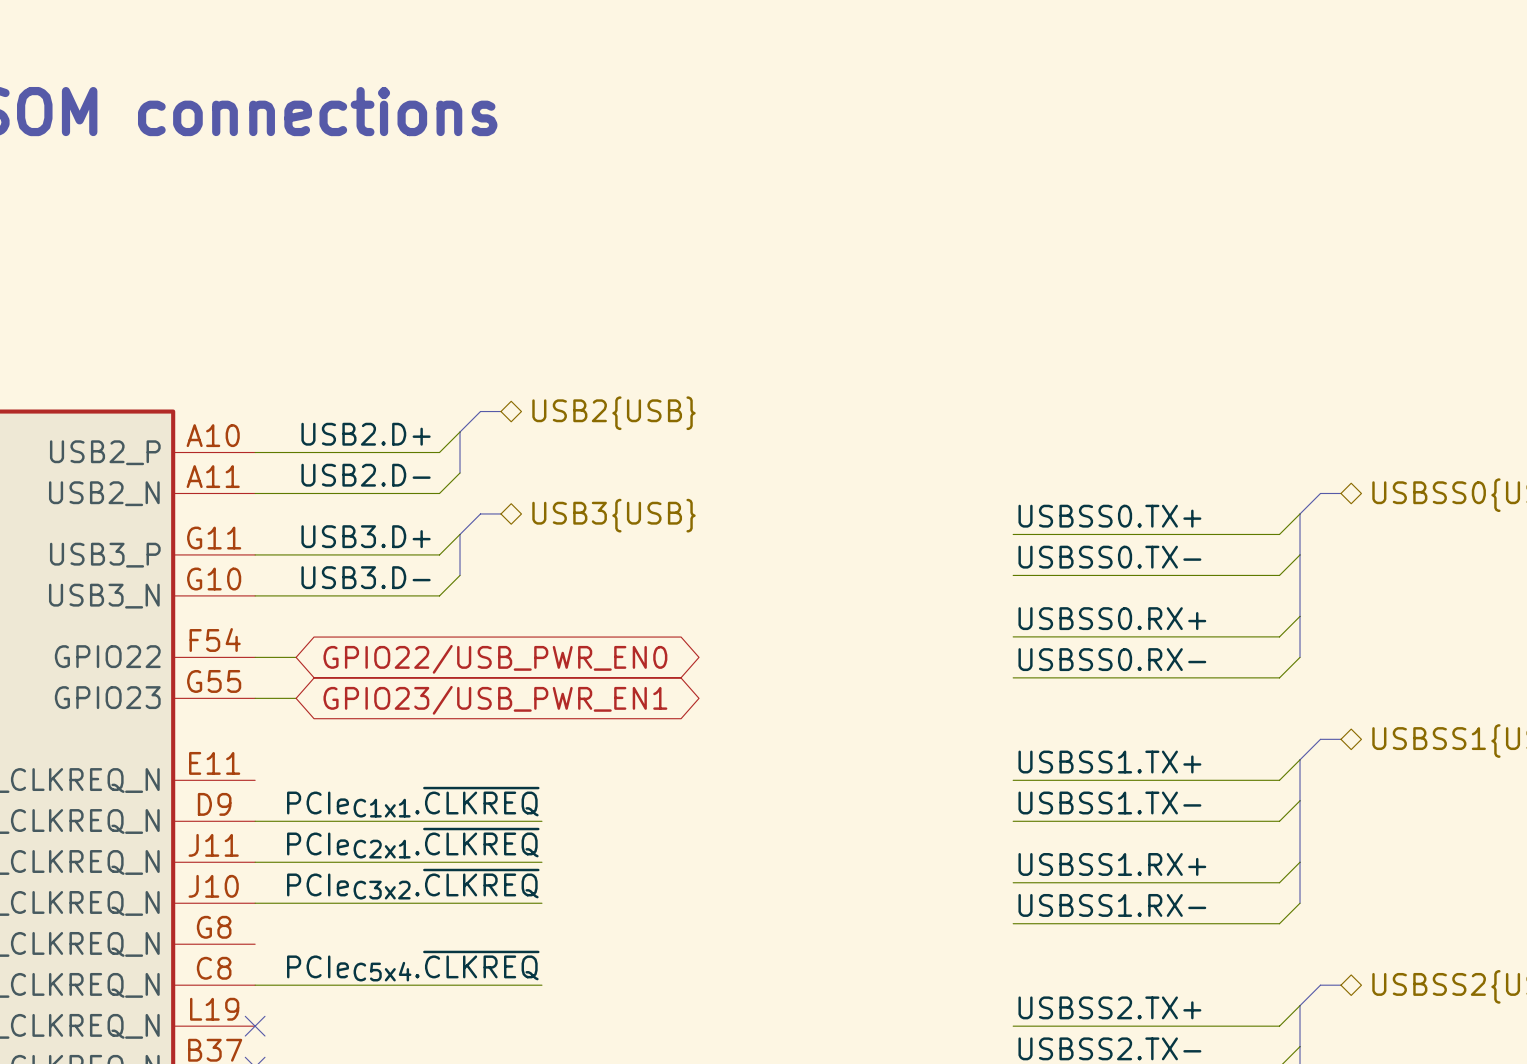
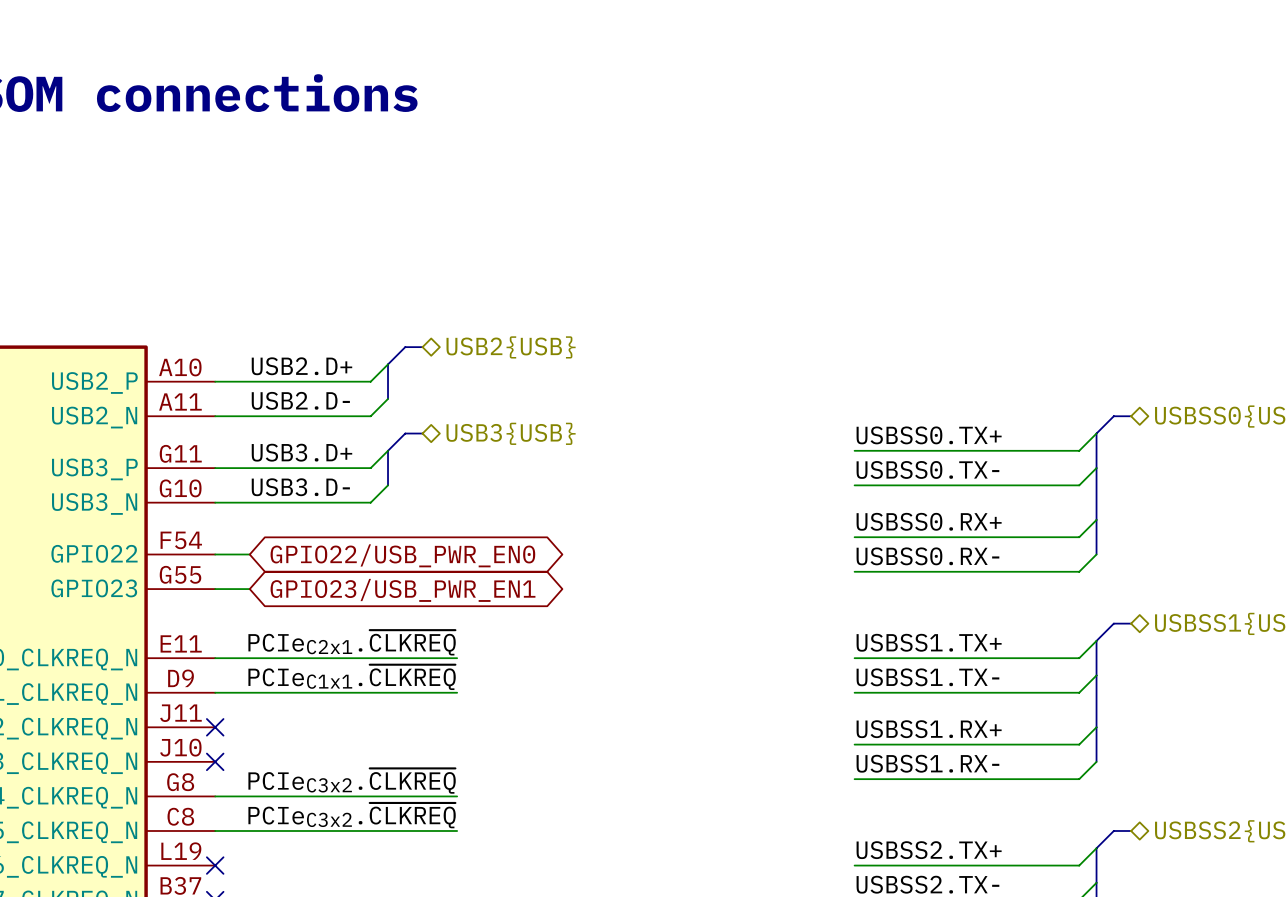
label position: PCIeC2x1.~{CLKREQ} (413, 843) -> PCIeC2x1.~{CLKREQ} (352, 642)
wire: (255, 862) (541, 862) -> (215, 658) (457, 658)
no-connect mark: none -> (215, 727)
label position: PCIeC3x2.~{CLKREQ} (413, 884) -> PCIeC3x2.~{CLKREQ} (352, 781)
wire: (255, 903) (541, 903) -> (215, 796) (457, 796)
no-connect mark: none -> (215, 761)
label: PCIeC5x4.~{CLKREQ} (413, 966) -> PCIeC3x2.~{CLKREQ} (352, 815)

